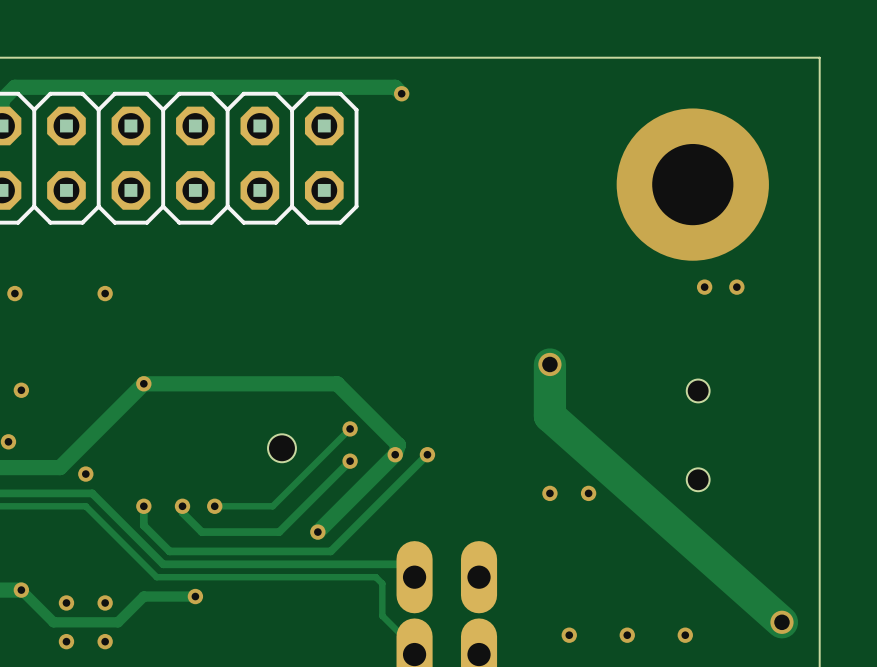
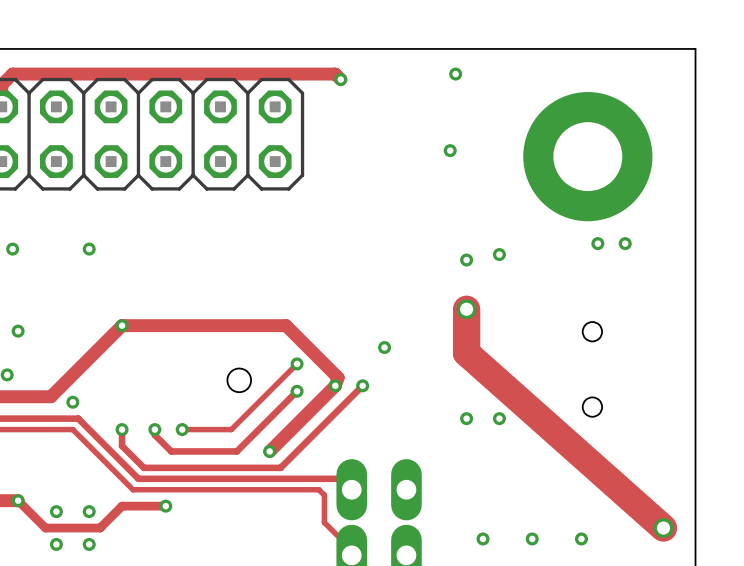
via: none -> (455, 74)
via: none -> (450, 150)
via: none -> (499, 254)
via: none -> (466, 260)
via: none -> (384, 347)

